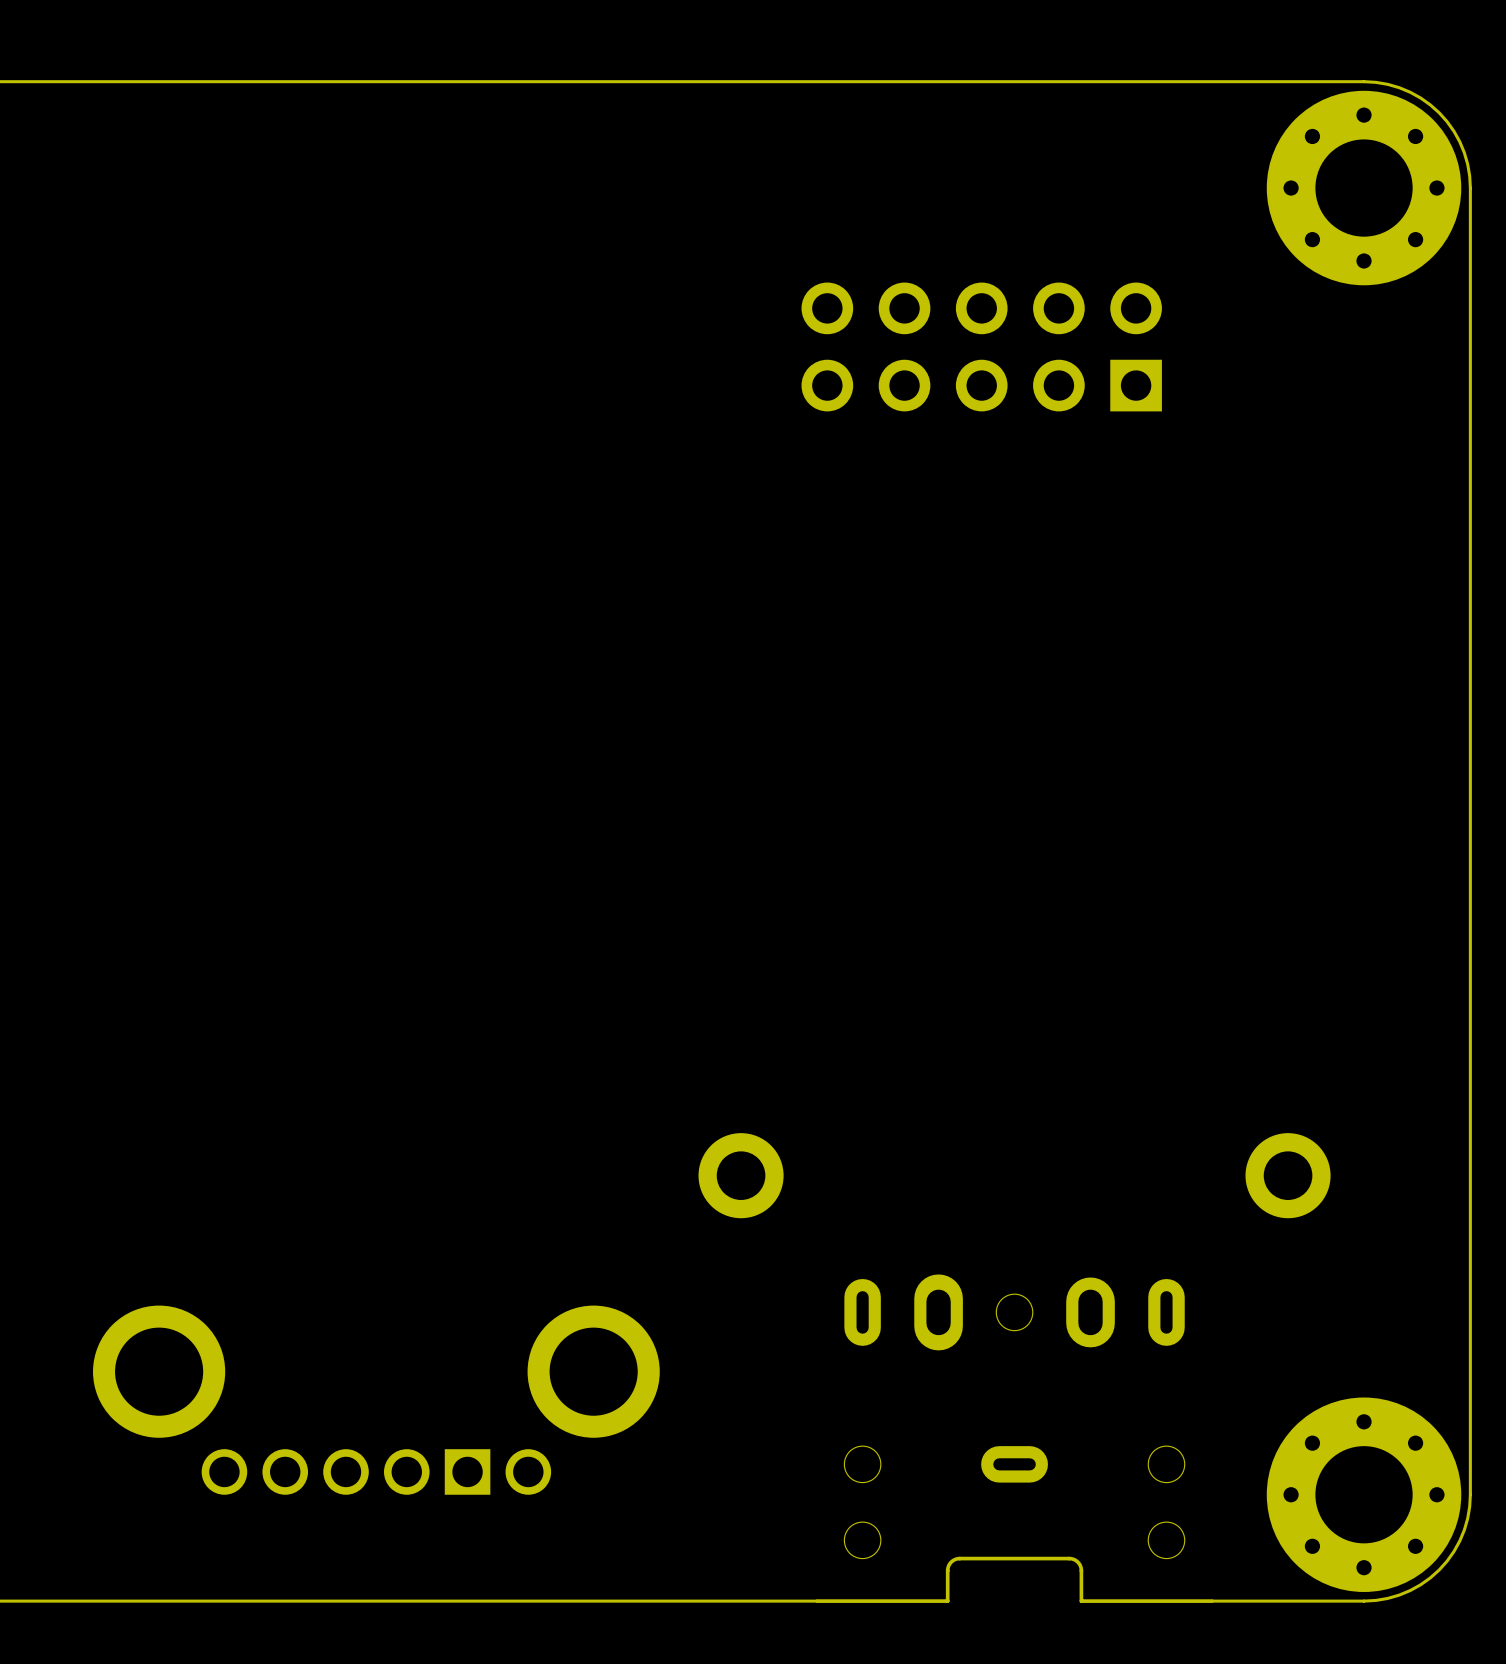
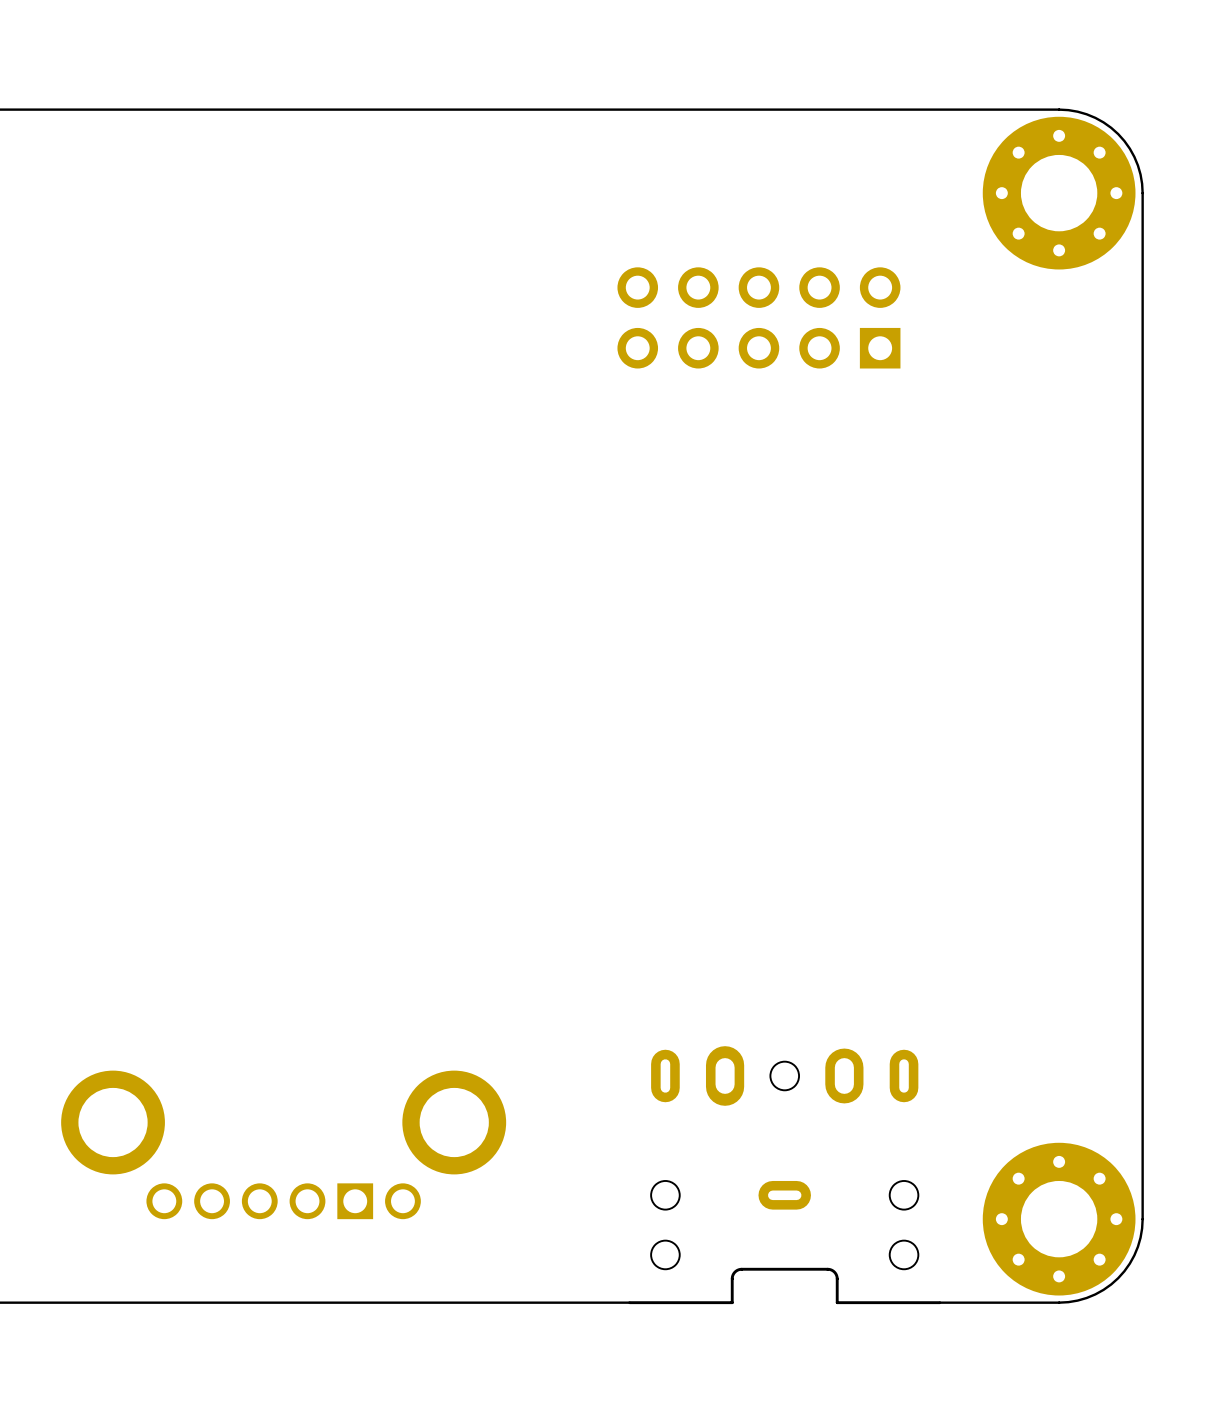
part: (741, 1175) -> none
part: (1288, 1175) -> none

